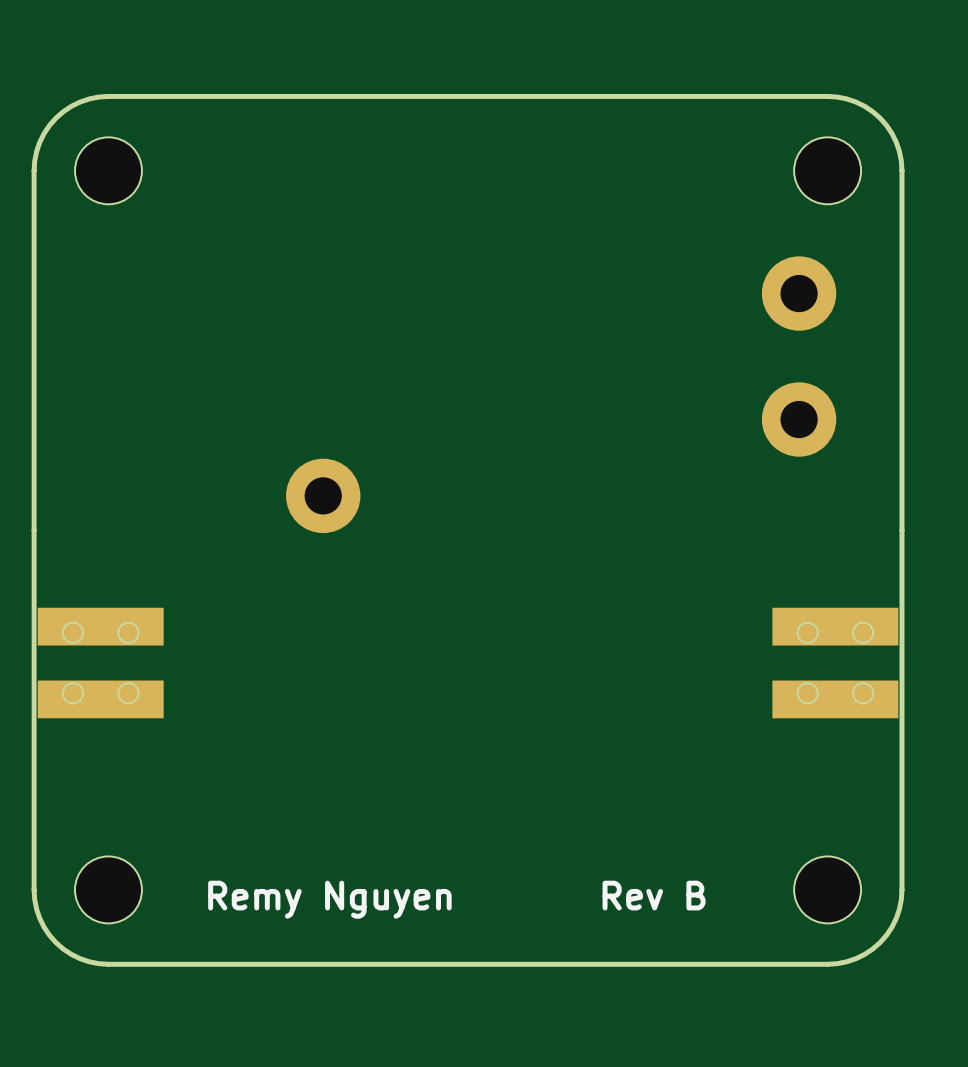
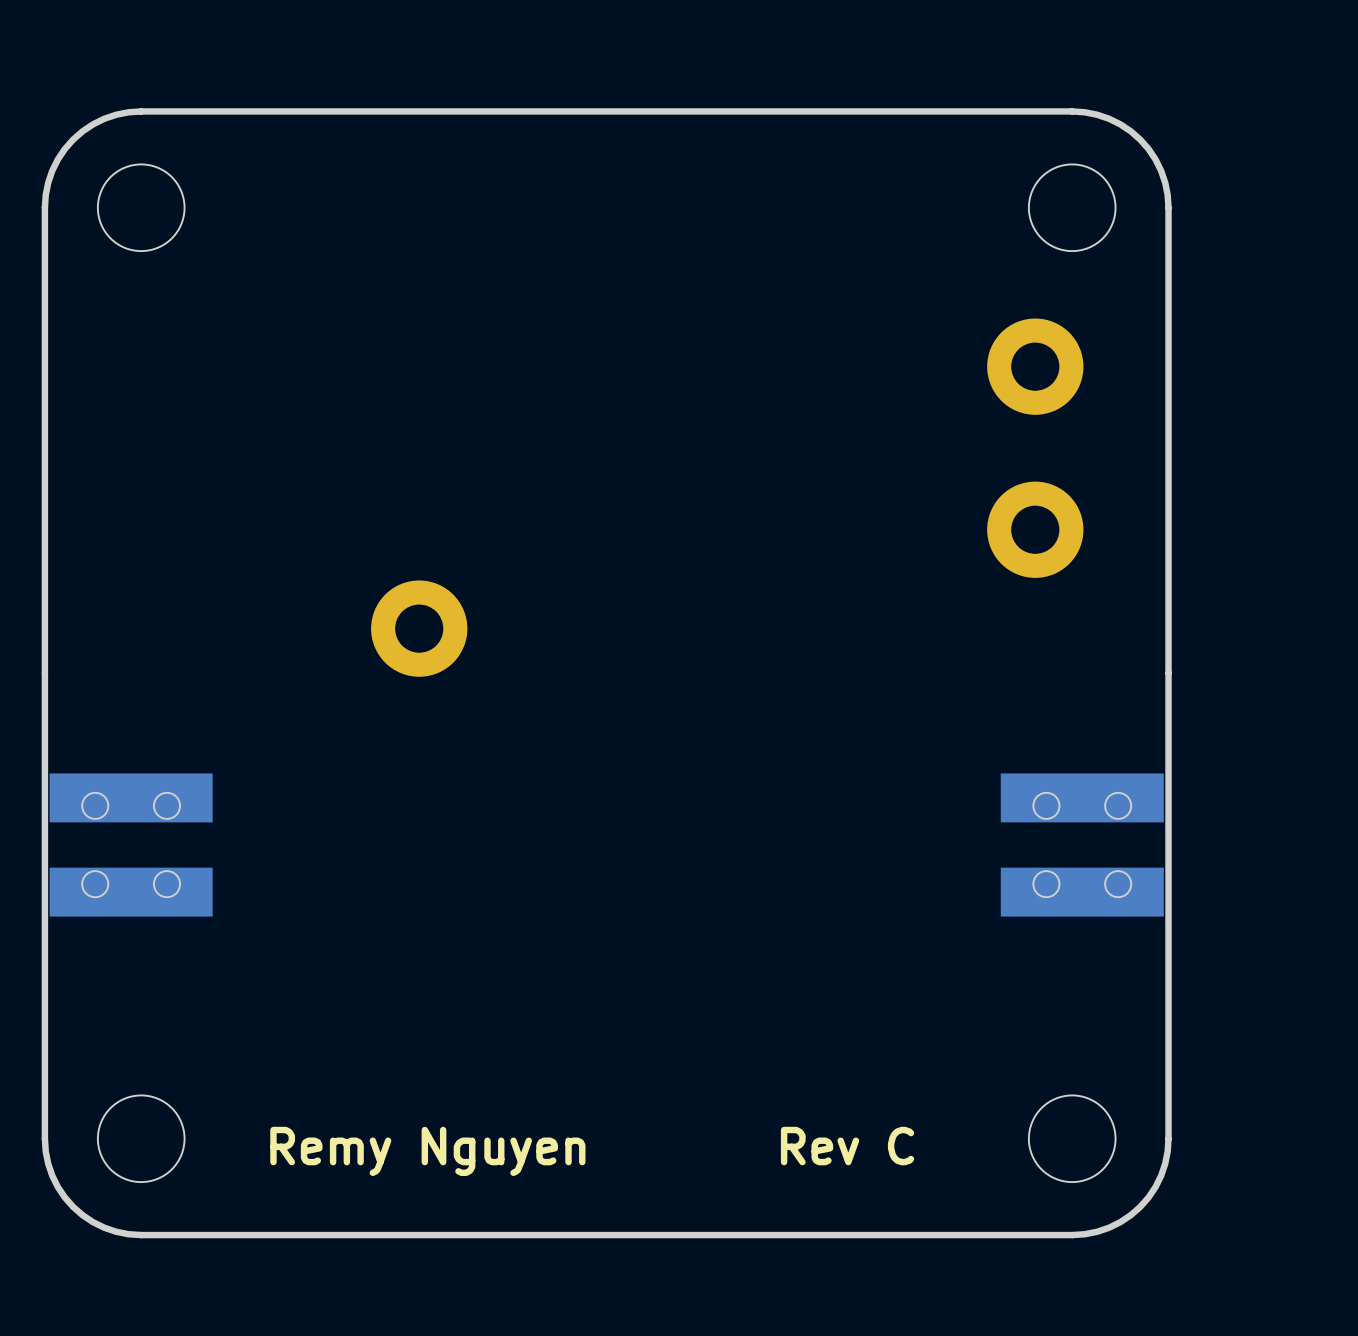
text: Rev B (654, 895) -> Rev C (847, 1146)

